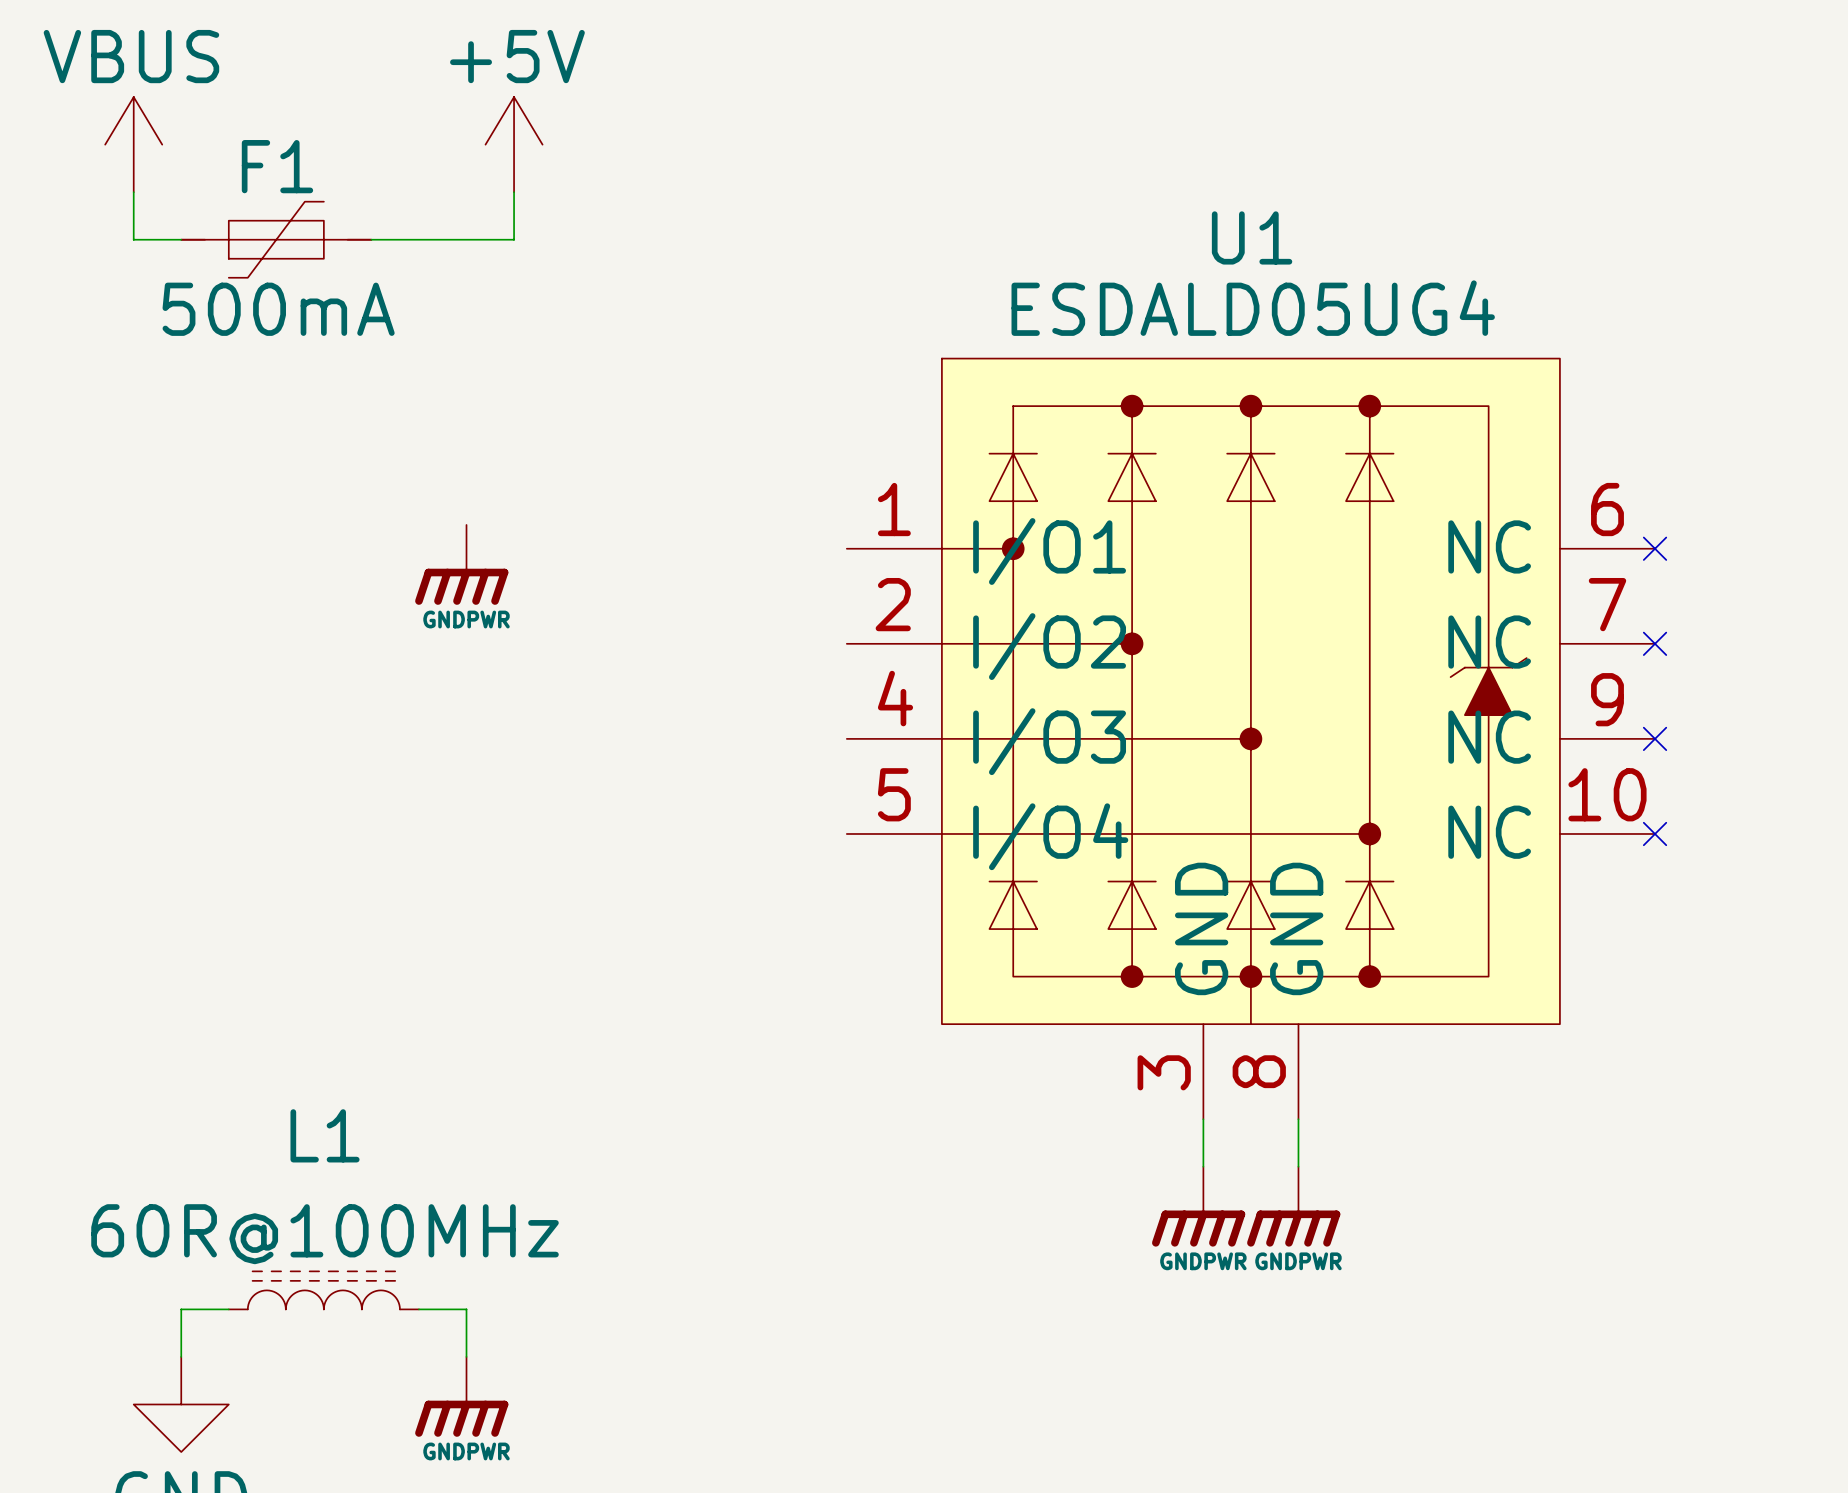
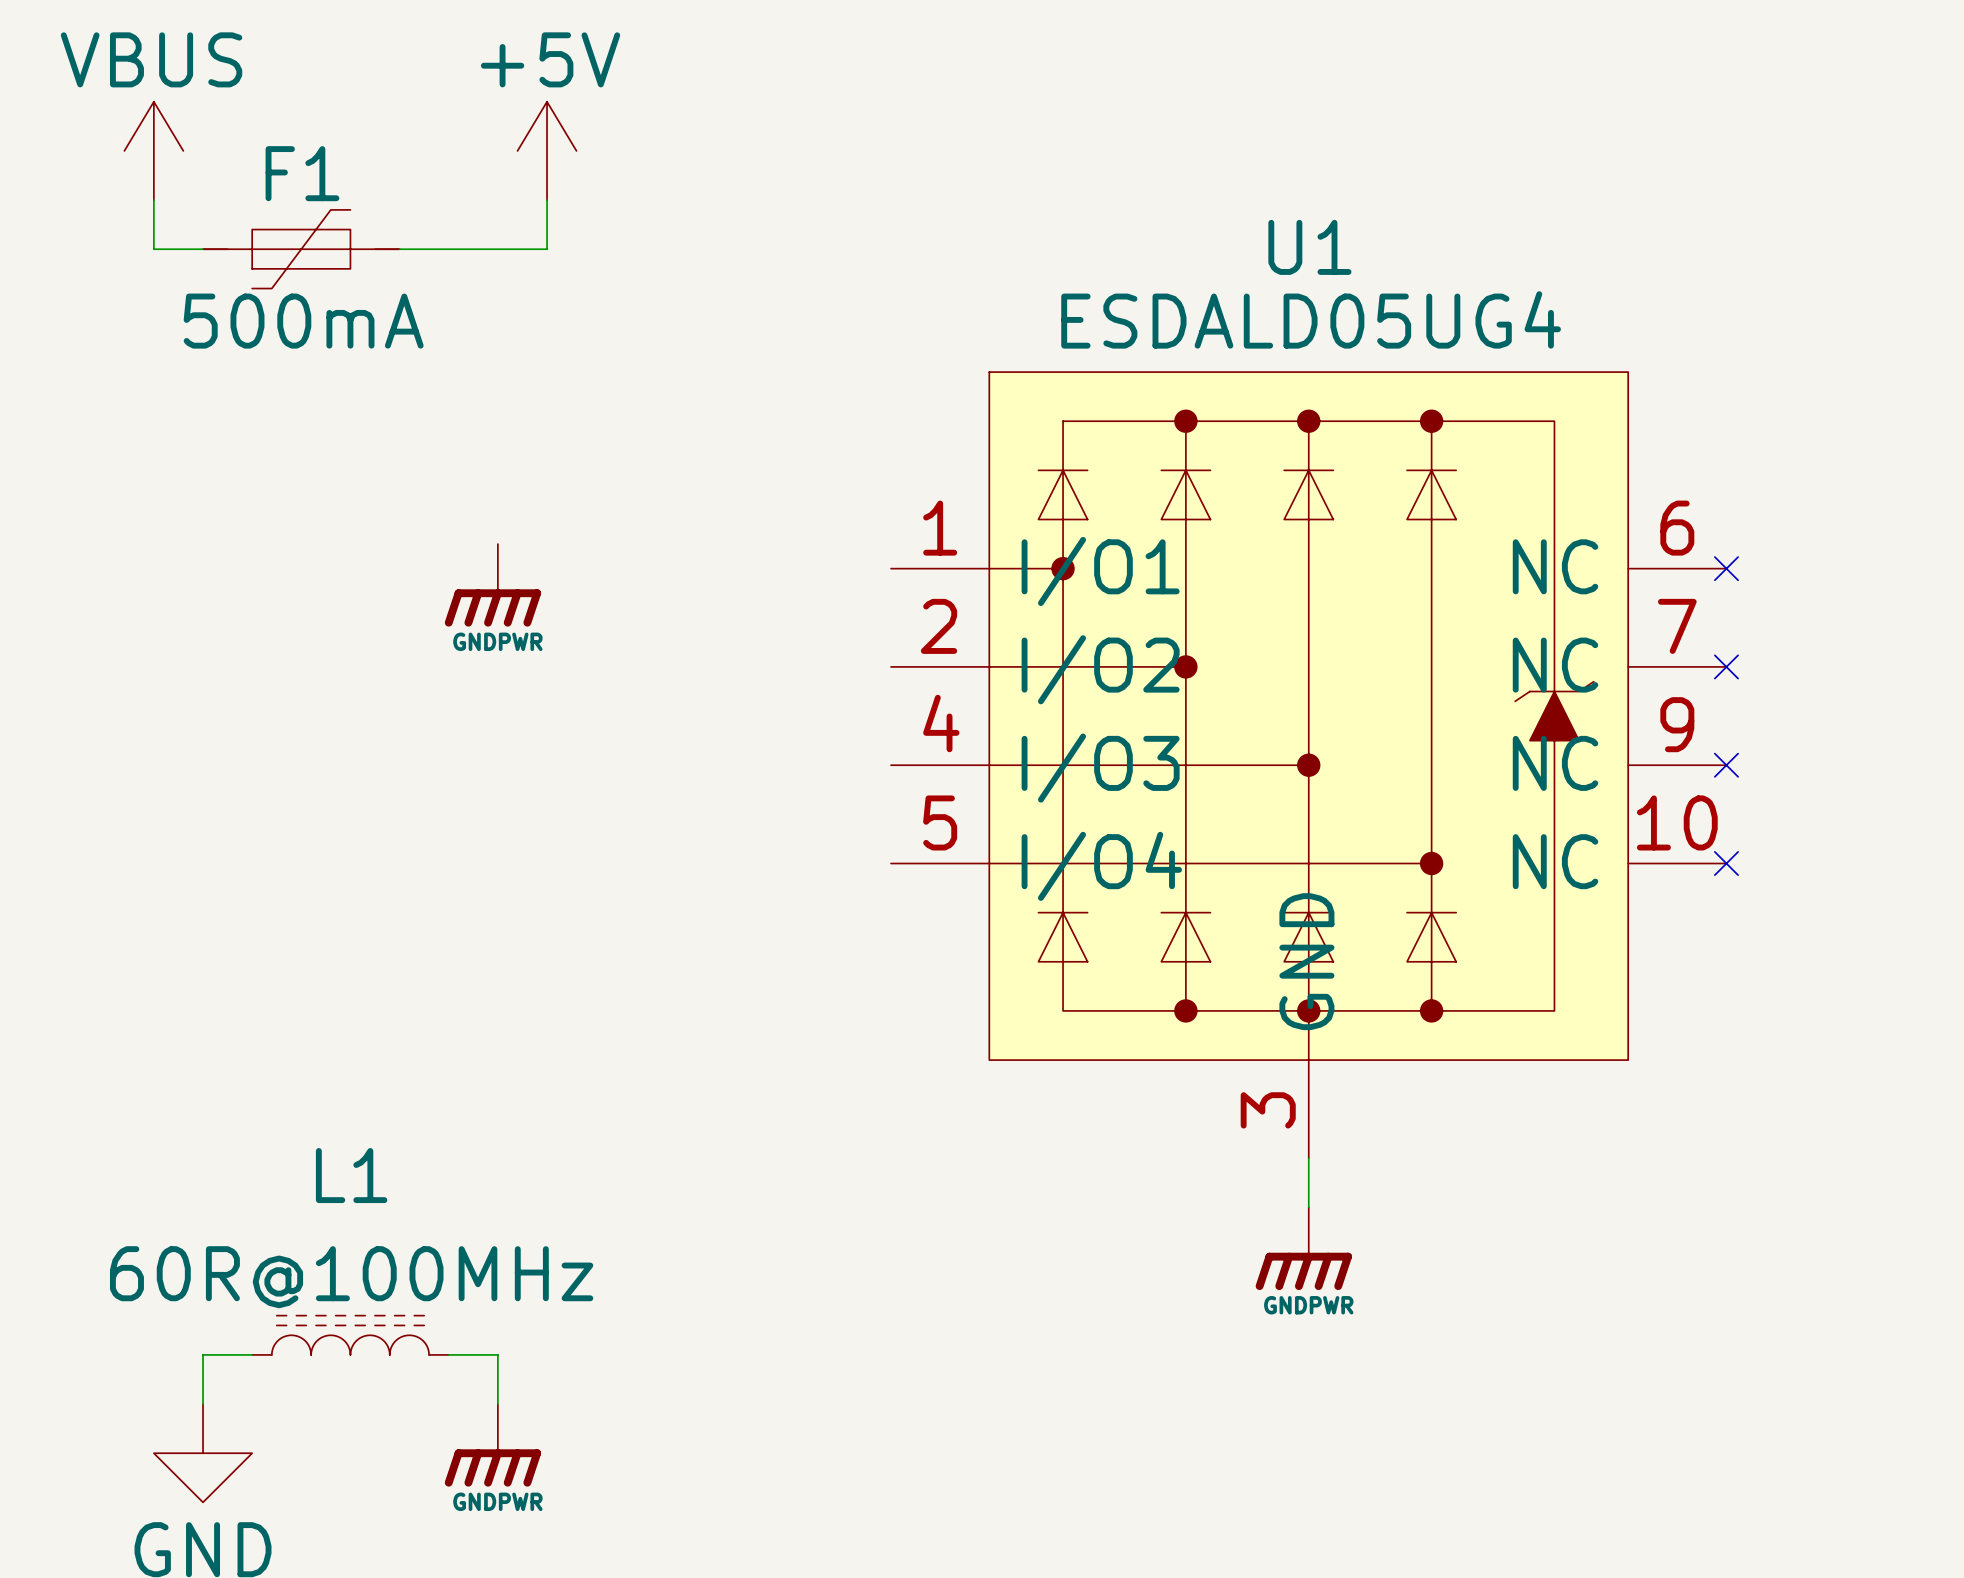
U1 symbol: [846, 358, 1667, 1120] -> [891, 372, 1739, 1159]
wire: (1203, 1119) (1203, 1166) -> (1308, 1158) (1308, 1207)
wire: (1298, 1119) (1298, 1166) -> none
power symbol: GNDPWR (1198, 1206) -> none
power symbol: none -> GNDPWR (1303, 1248)
power symbol: GNDPWR (1293, 1206) -> none

